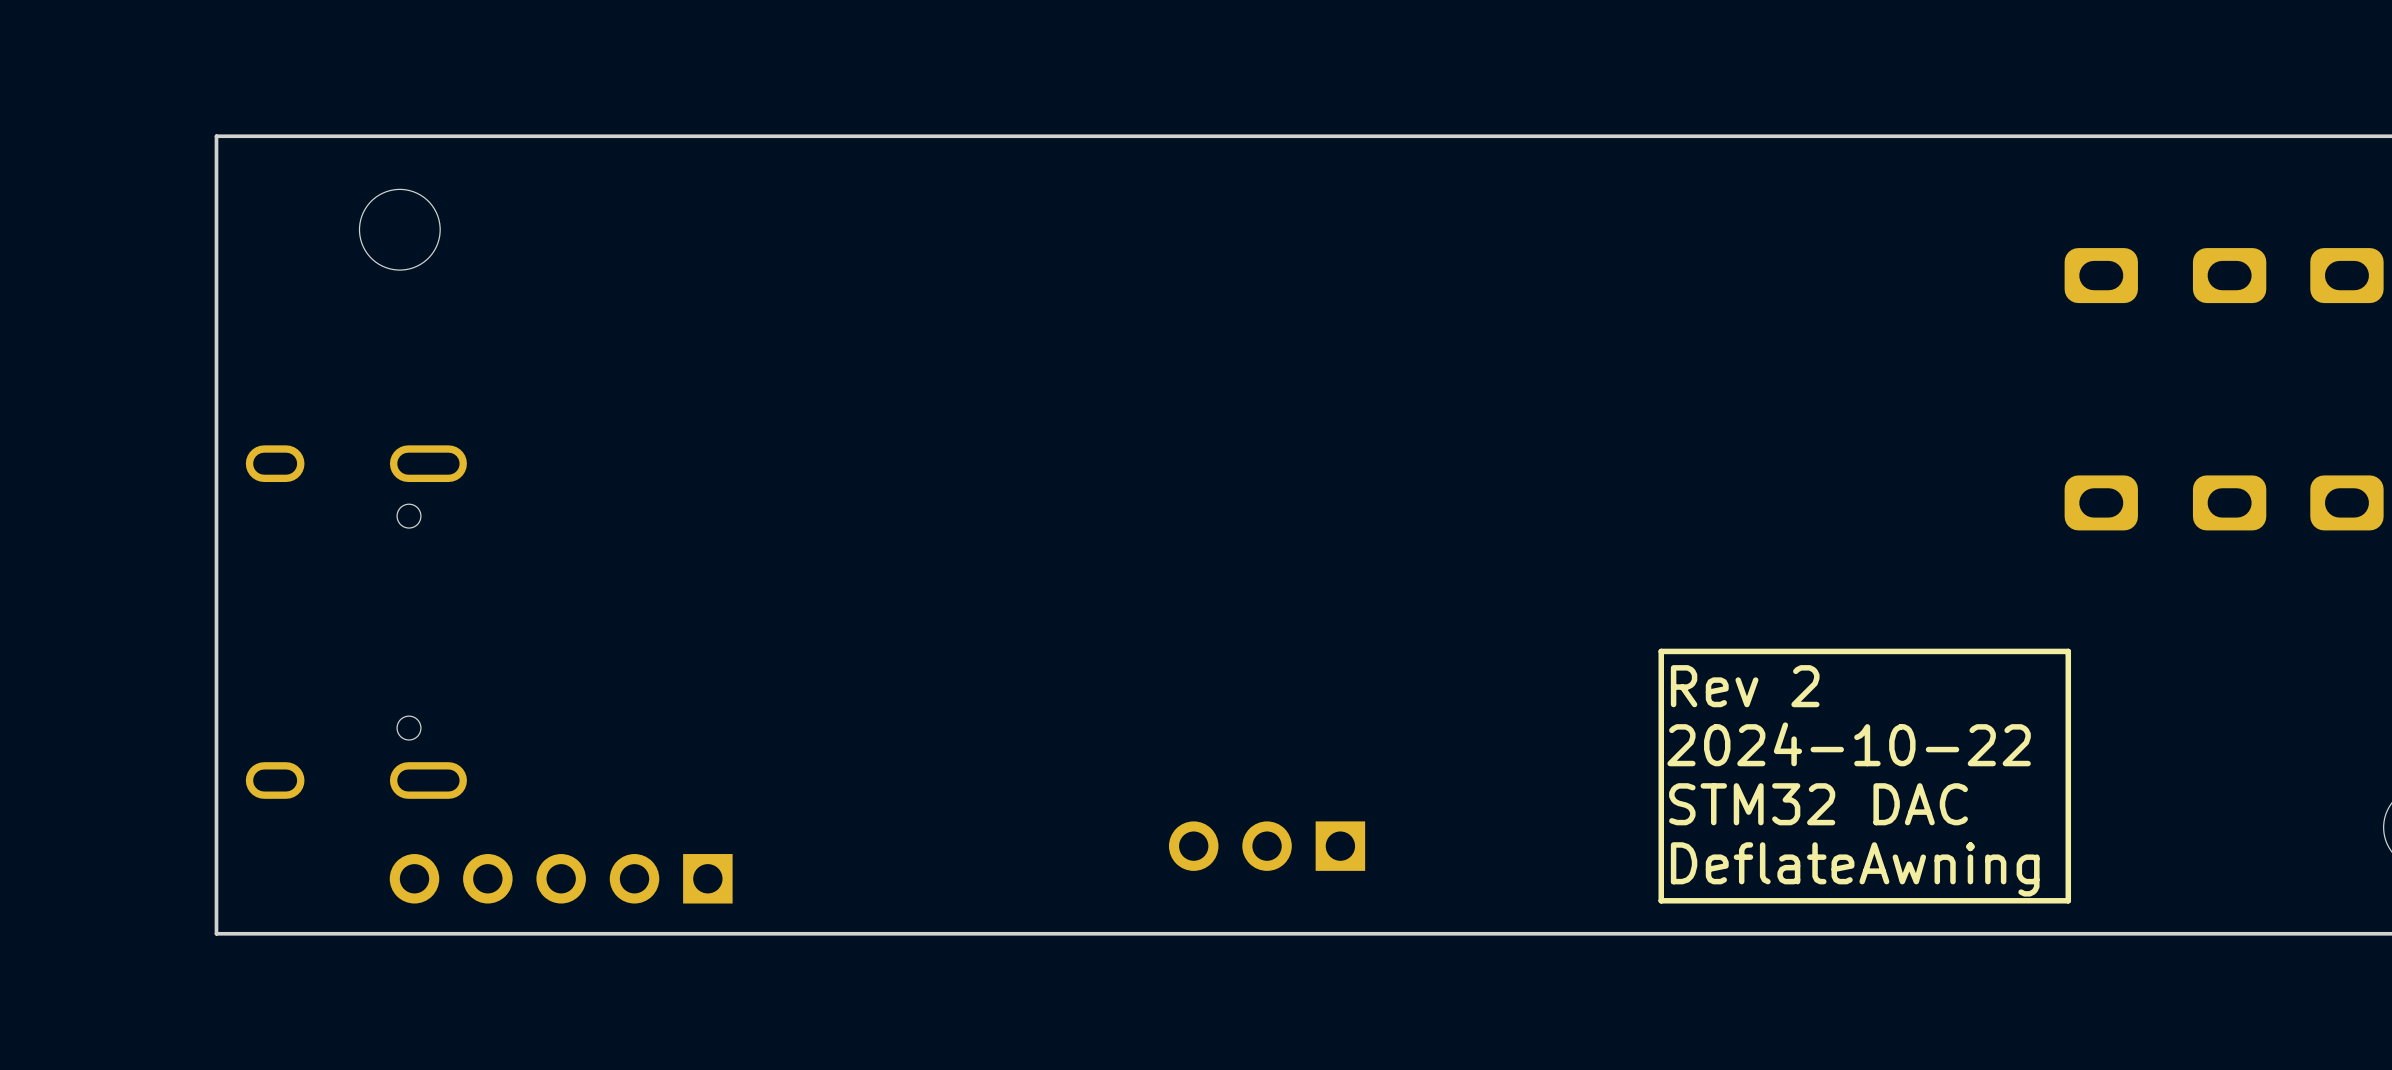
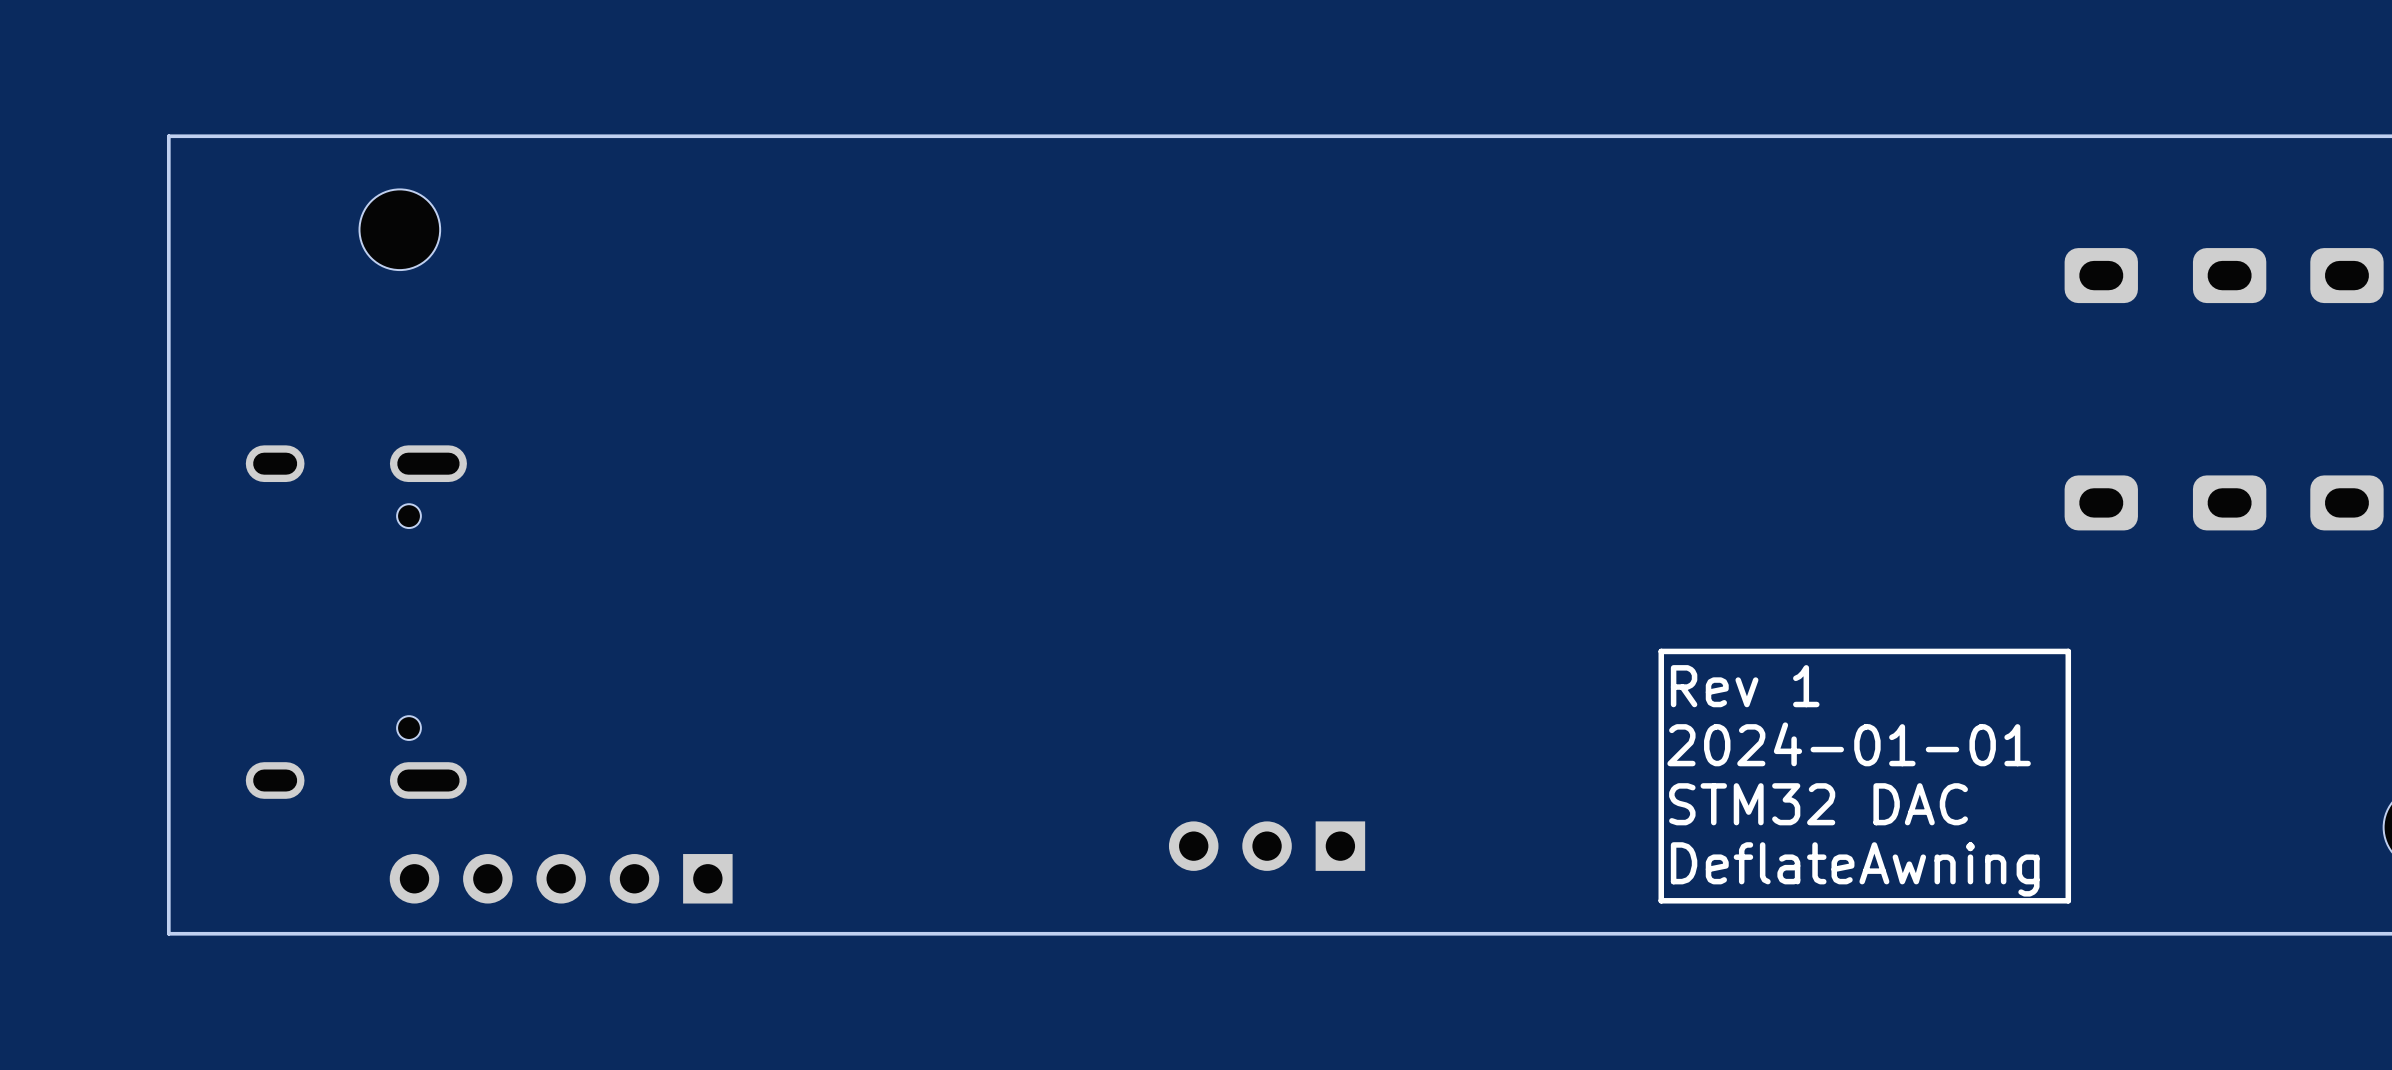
board edge: (216, 136) (216, 933) -> (216, 136) (168, 136) (168, 933) (216, 933)
text: Rev 2 (1745, 686) -> Rev 1 (1745, 686)
text: 2024-10-22 (1849, 744) -> 2024-01-01 (1849, 744)

